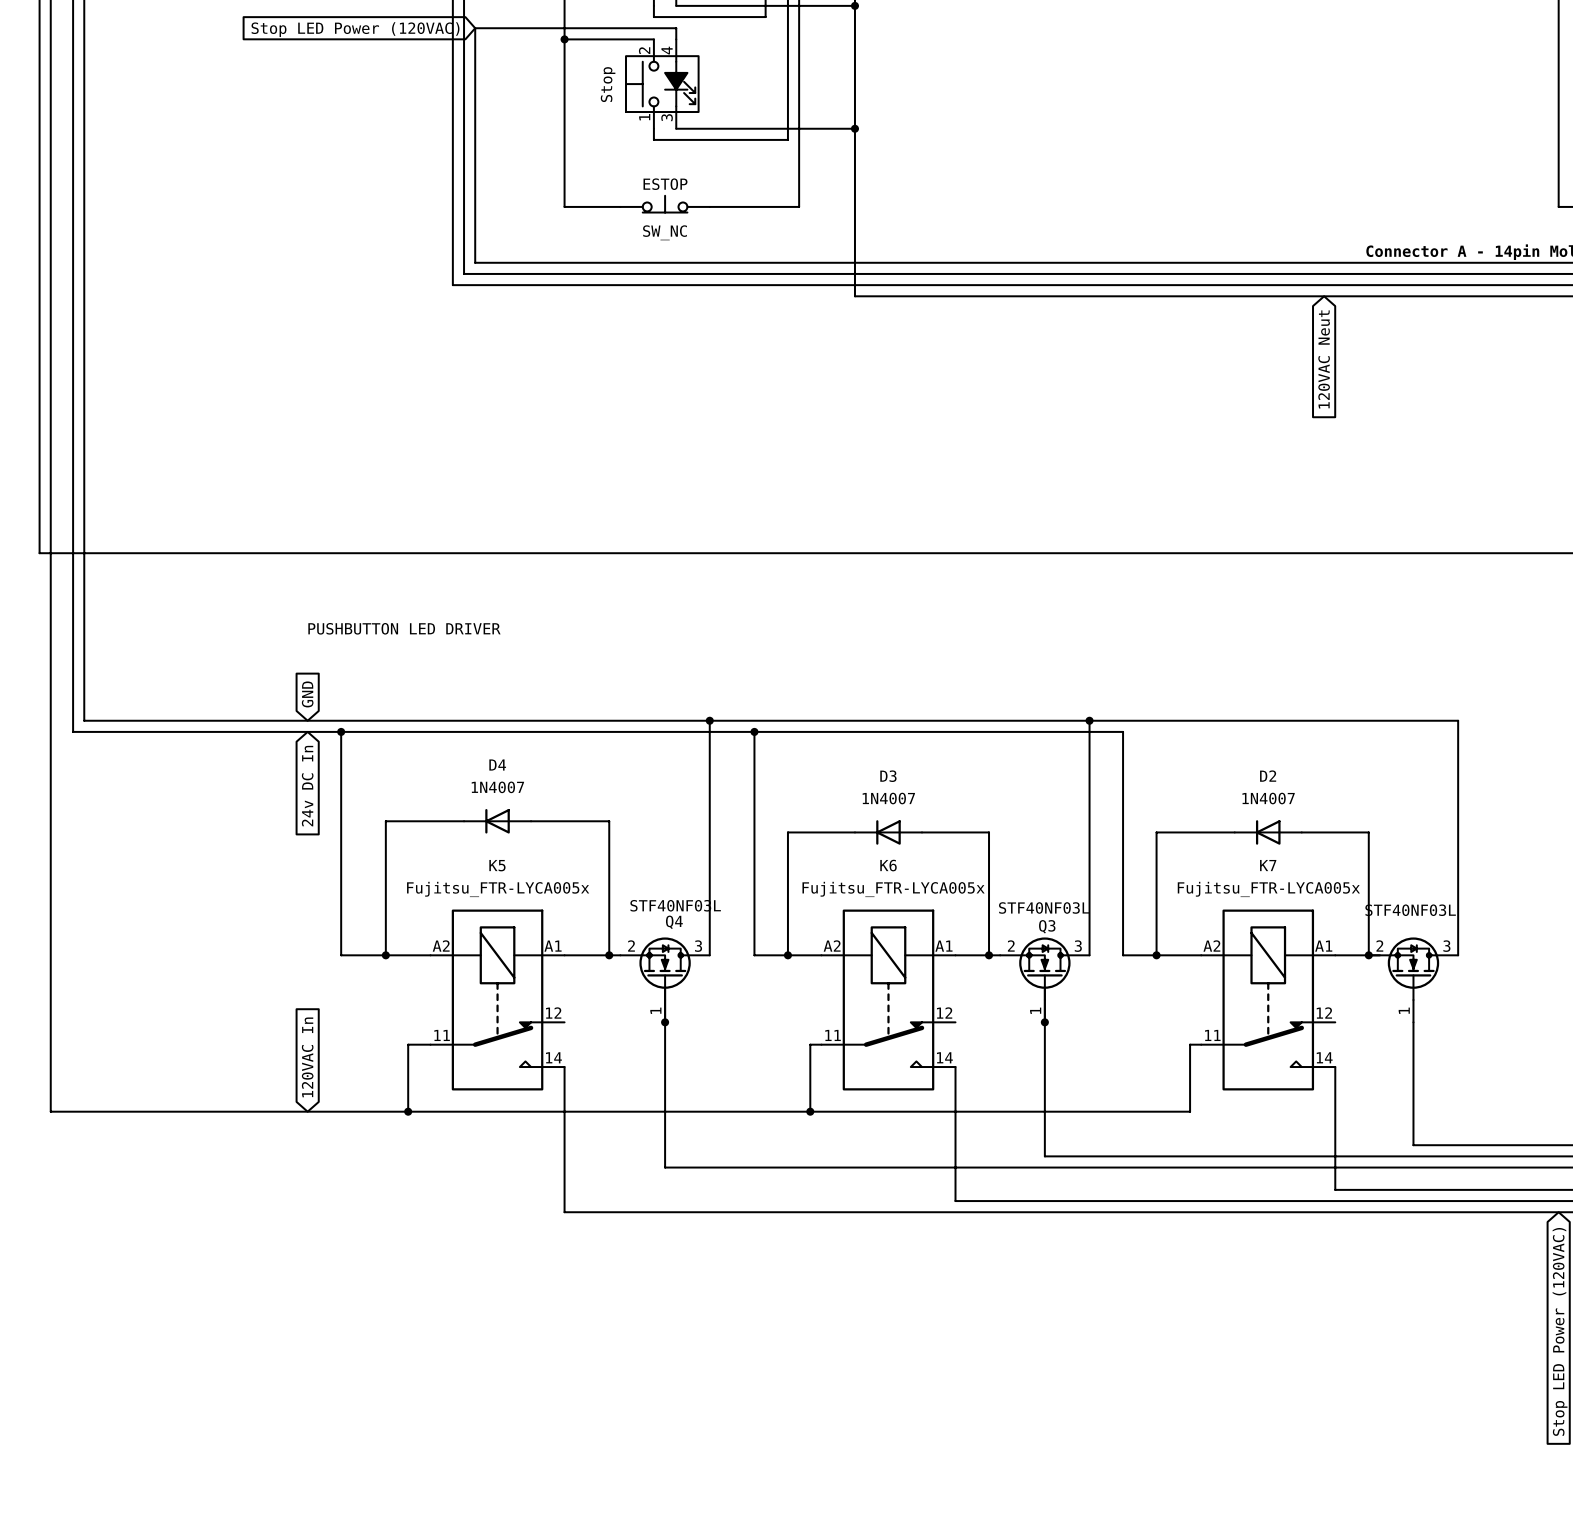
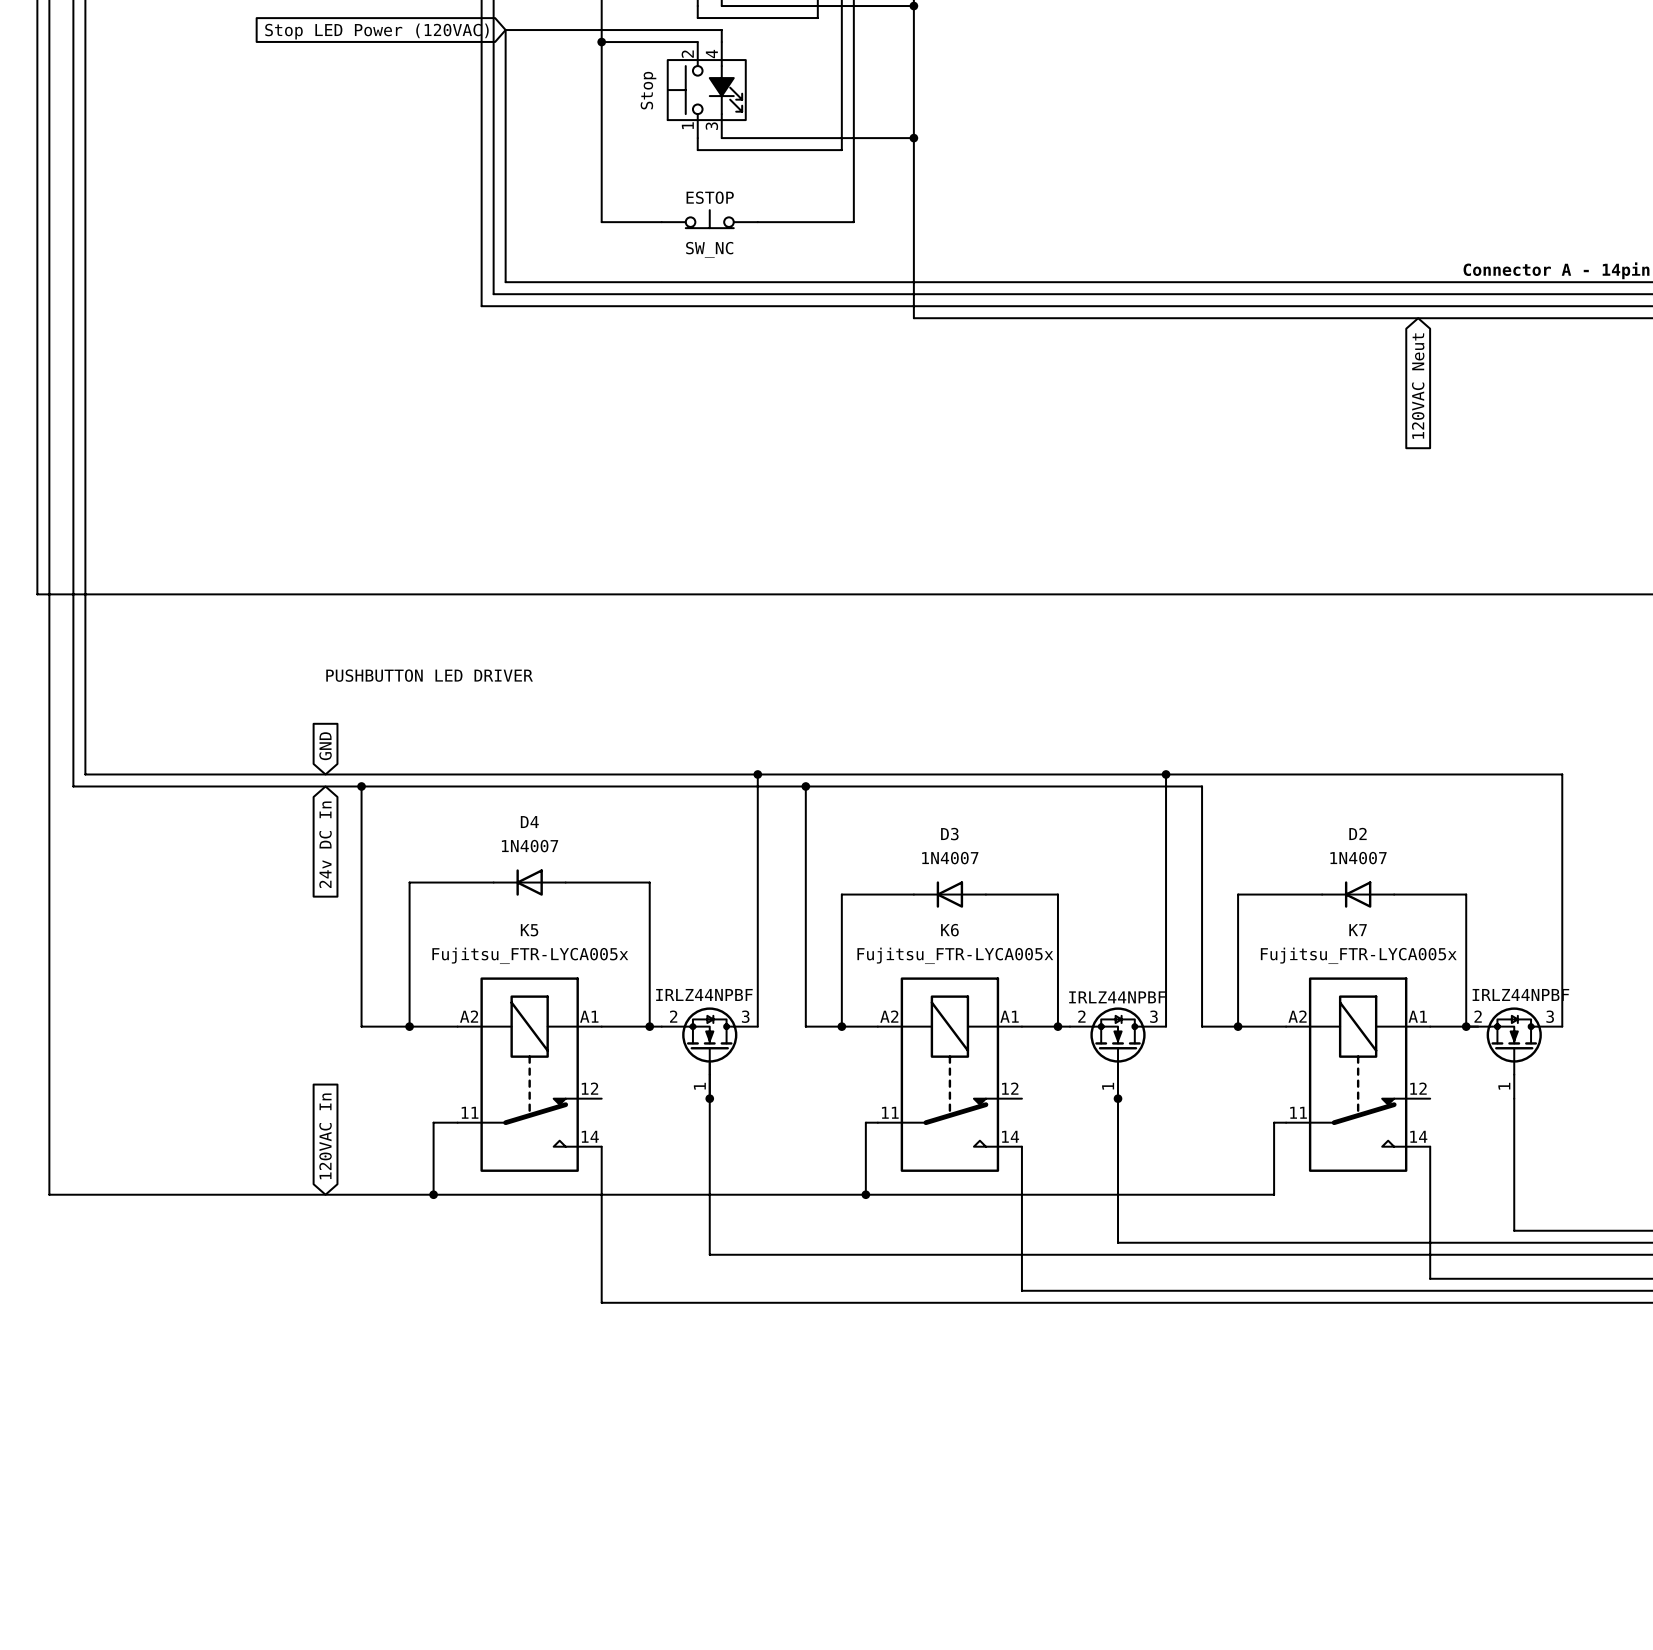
Q4 value: STF40NF03L (675, 905) -> IRLZ44NPBF (704, 994)
Q3 value: STF40NF03L (1044, 907) -> IRLZ44NPBF (1117, 997)
part value: STF40NF03L (1410, 910) -> IRLZ44NPBF (1520, 994)
Q4 name: Q4 (674, 922) -> none
Q3 name: Q3 (1047, 926) -> none

